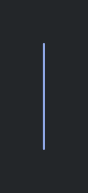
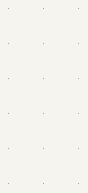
line: (43, 43) (43, 148) -> none

